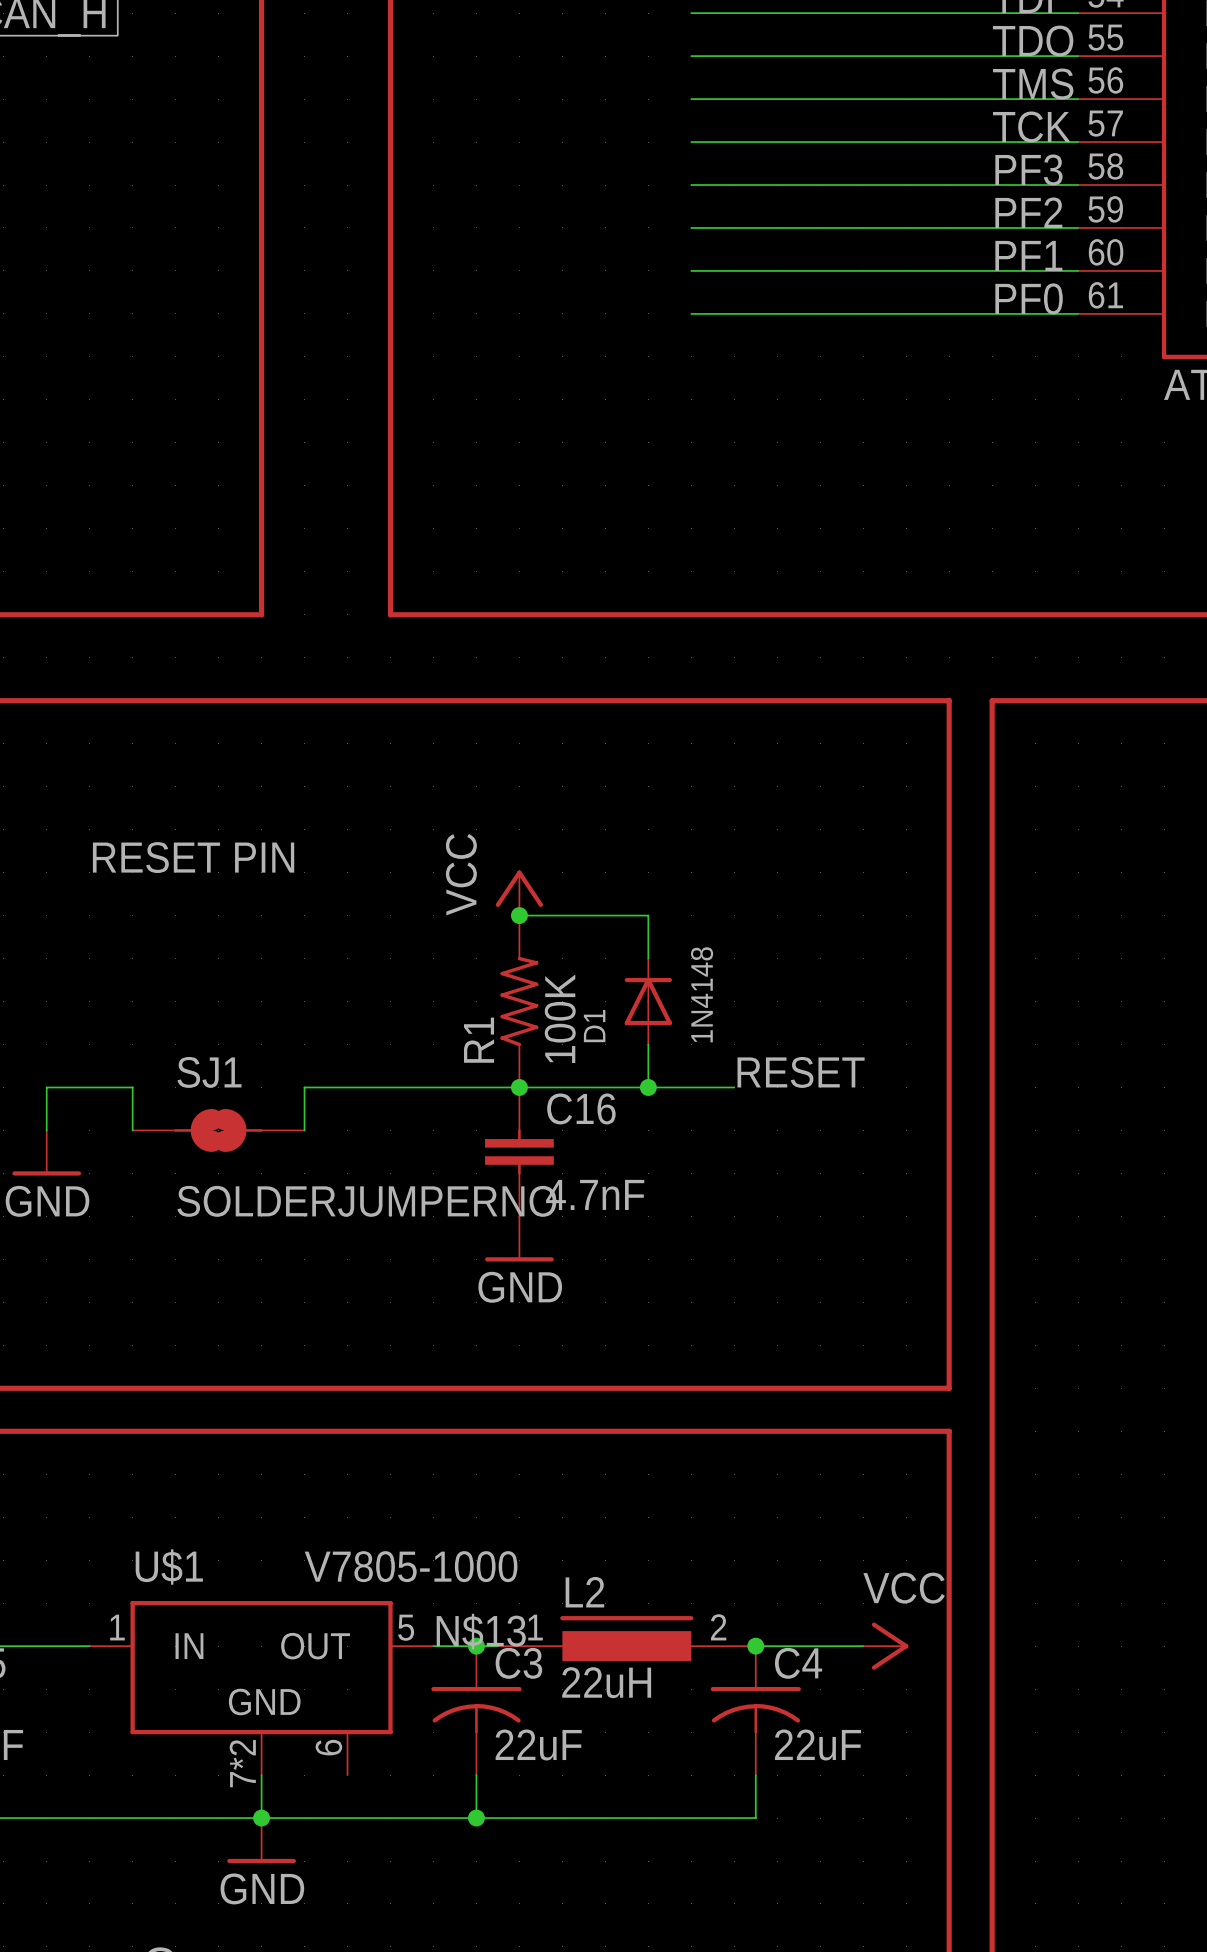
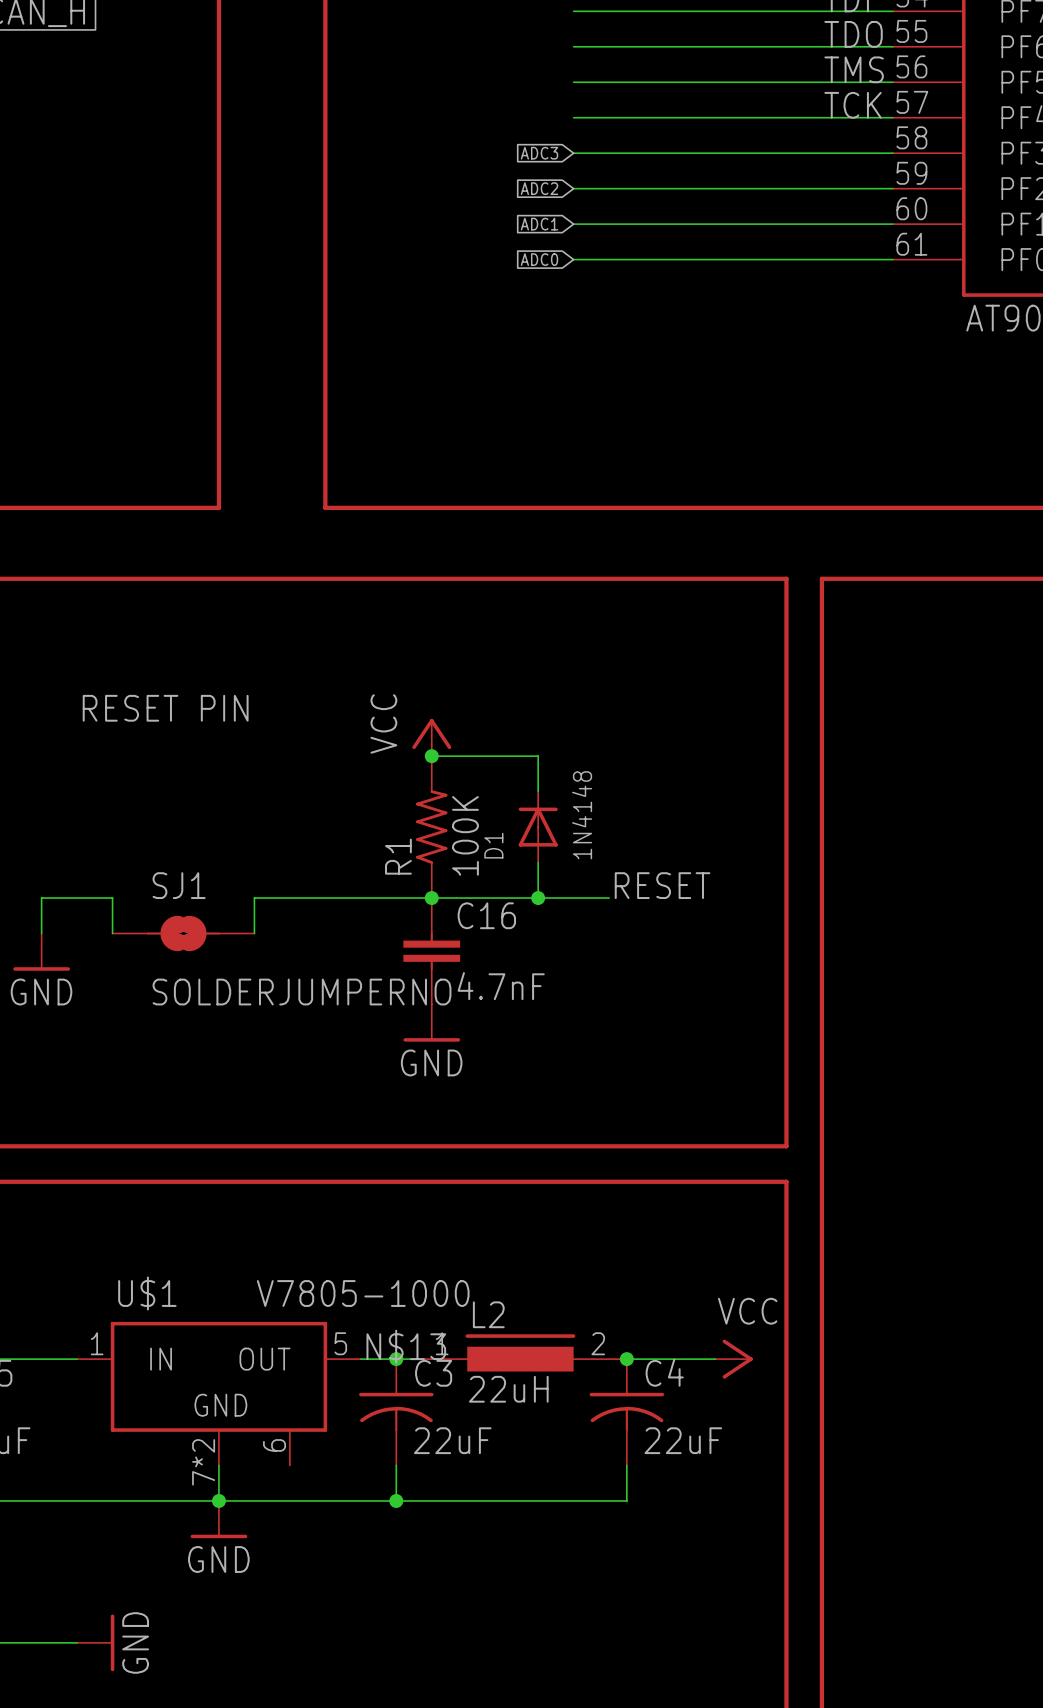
label: PF3 (1028, 169) -> none
global label: none -> ADC3 (539, 153)
label: PF2 (1028, 212) -> none
global label: none -> ADC2 (539, 188)
label: PF1 (1028, 255) -> none
global label: none -> ADC1 (539, 224)
label: PF0 (1029, 298) -> none
global label: none -> ADC0 (539, 259)

